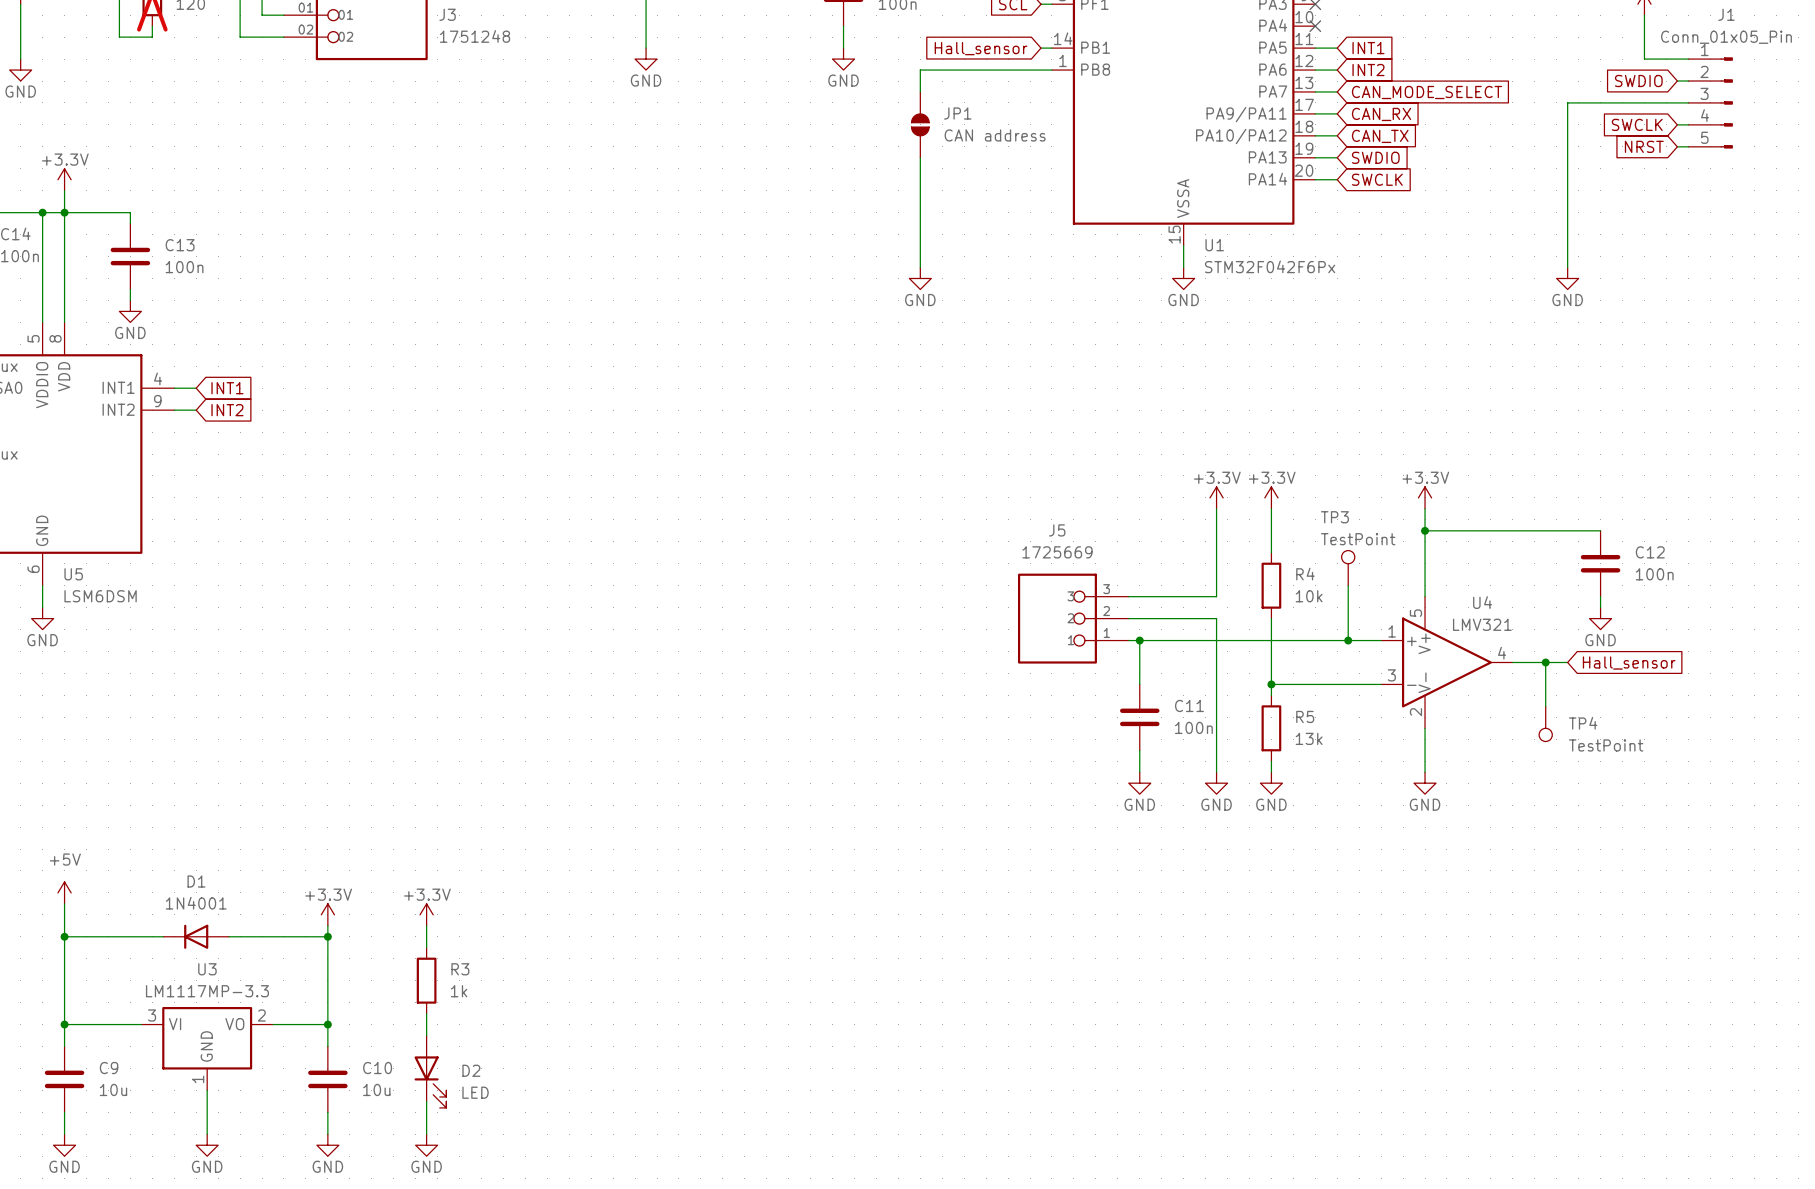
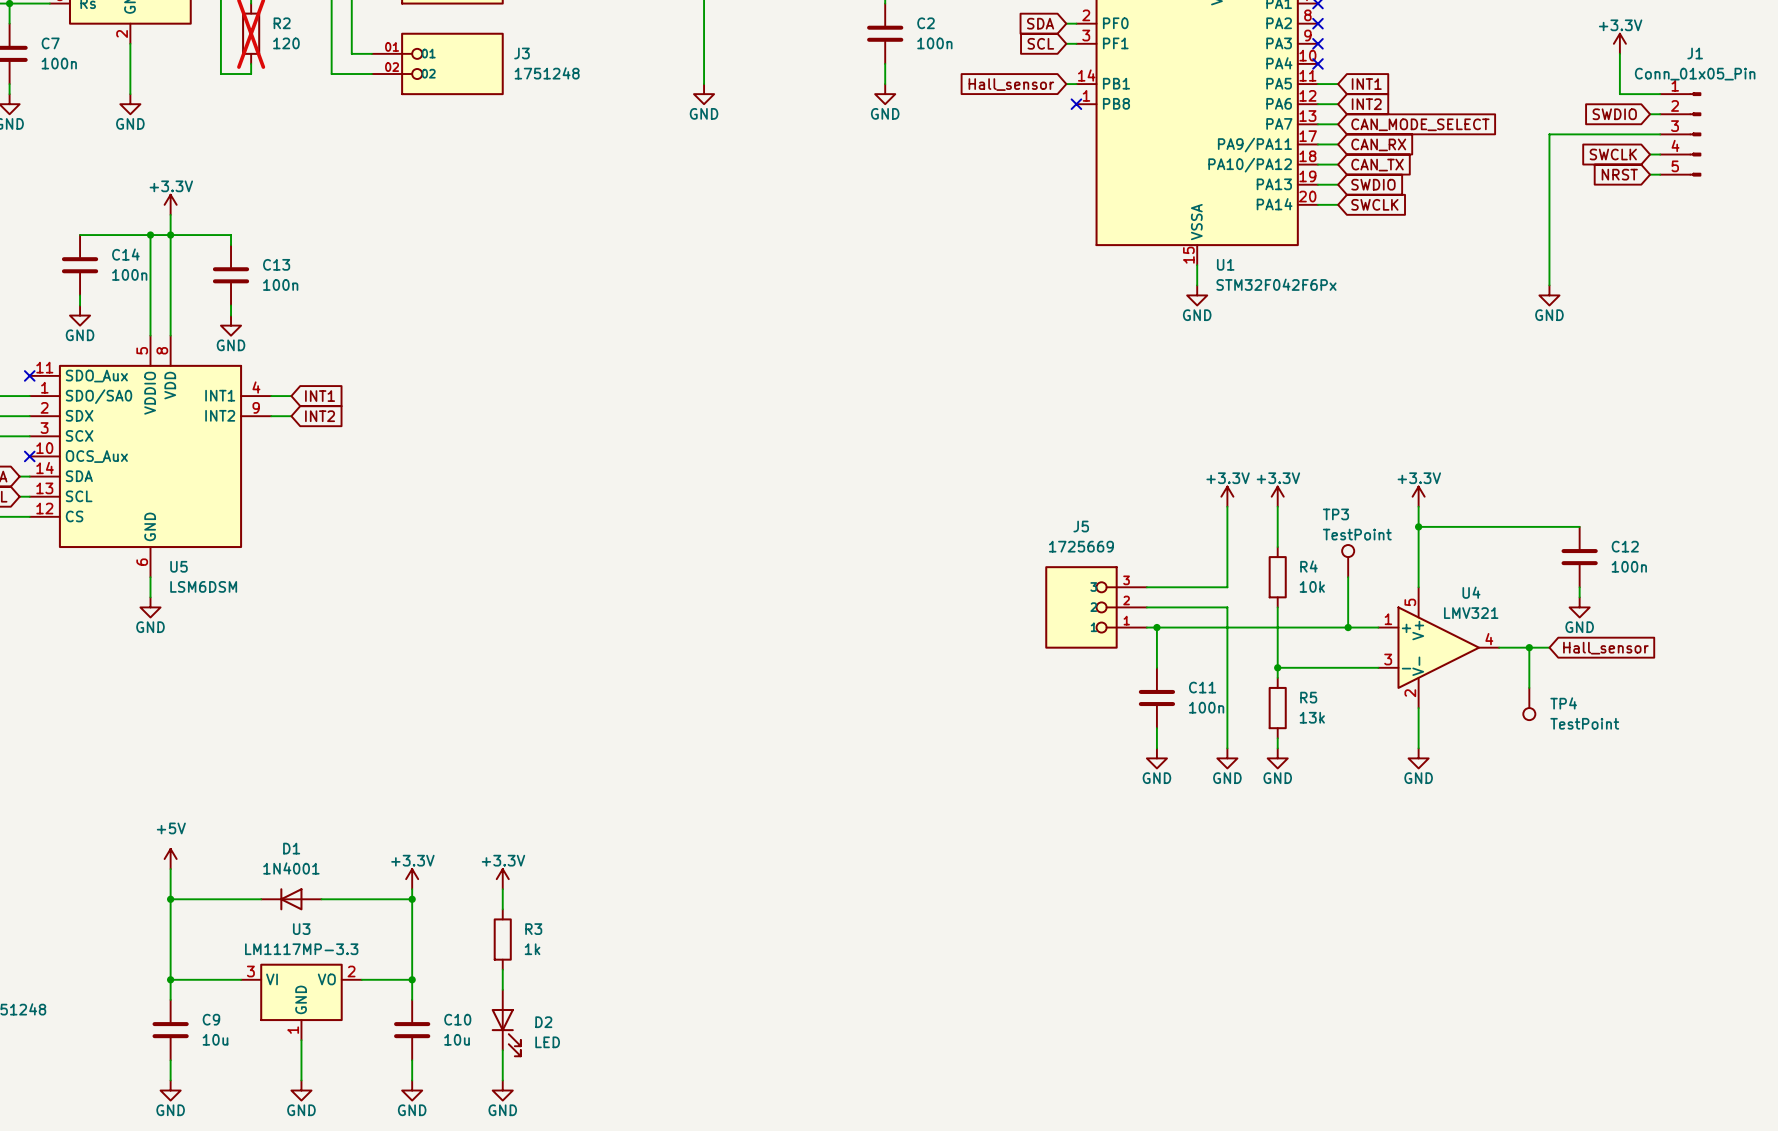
wire: (1051, 70) (920, 70) (920, 91) -> none
no-connect mark: none -> (1076, 104)
JP1: CAN address (920, 124) -> none
wire: (920, 157) (920, 267) -> none
power symbol: GND (920, 278) -> none

